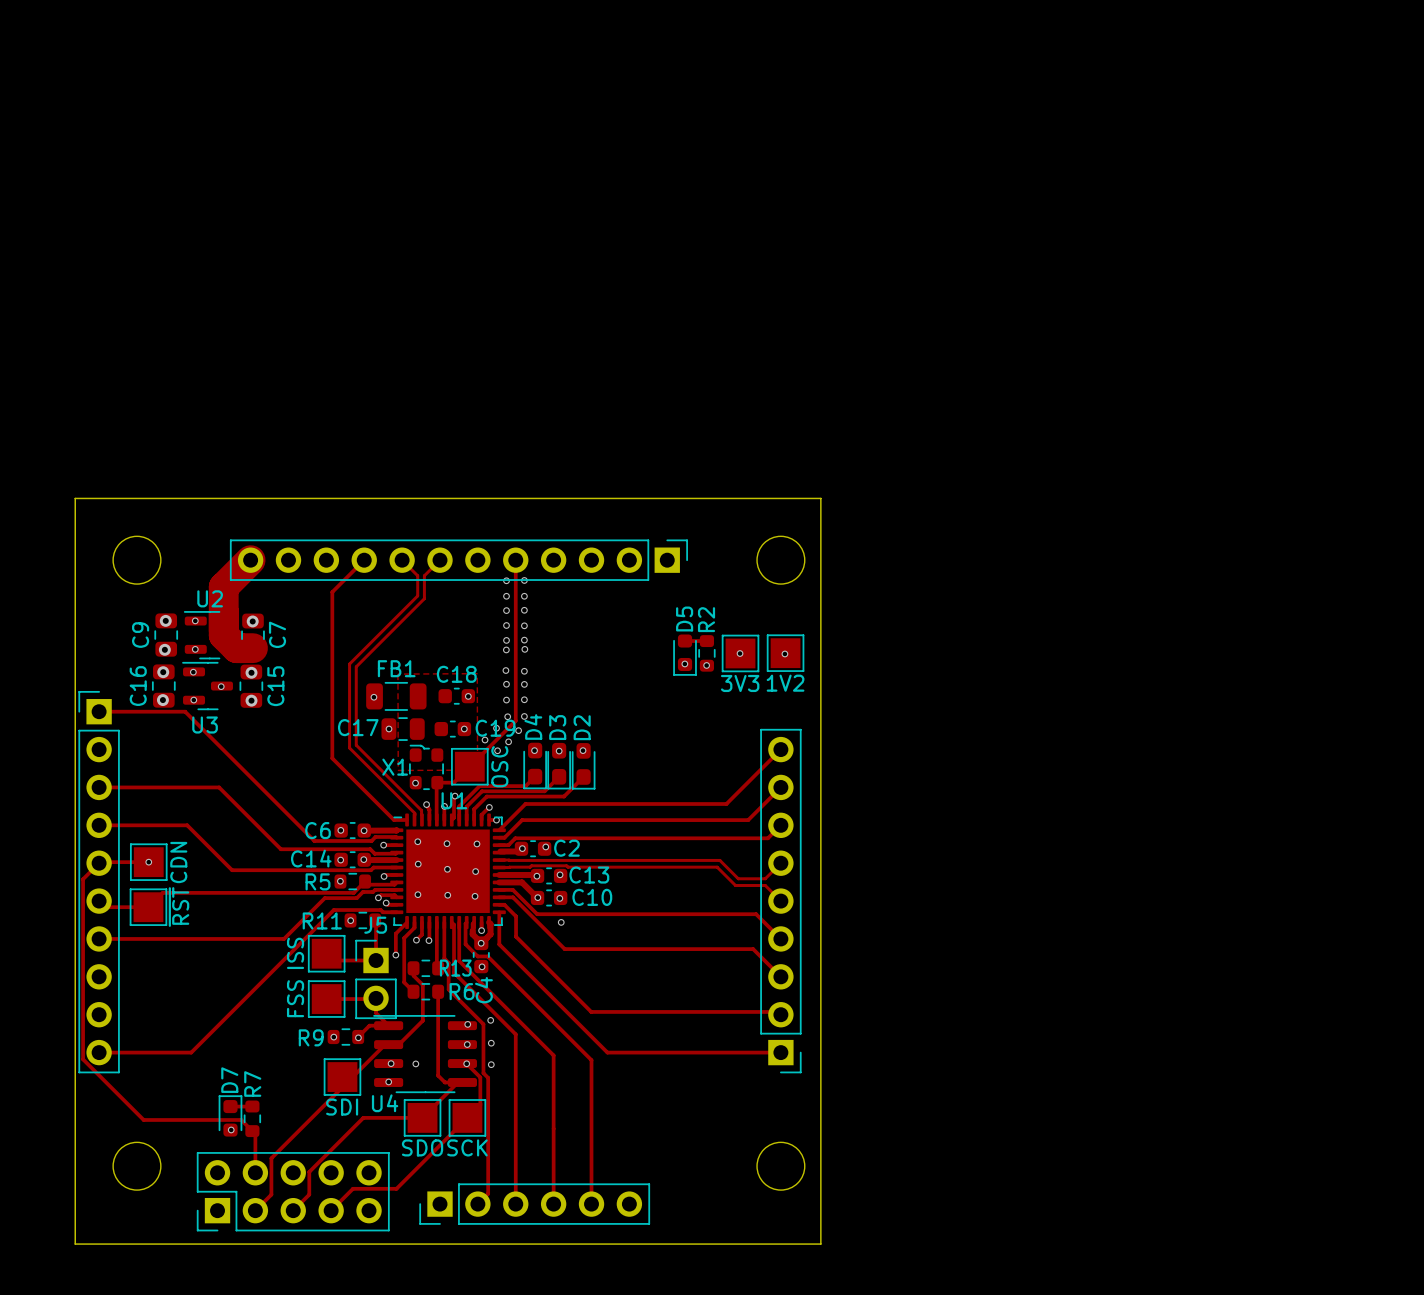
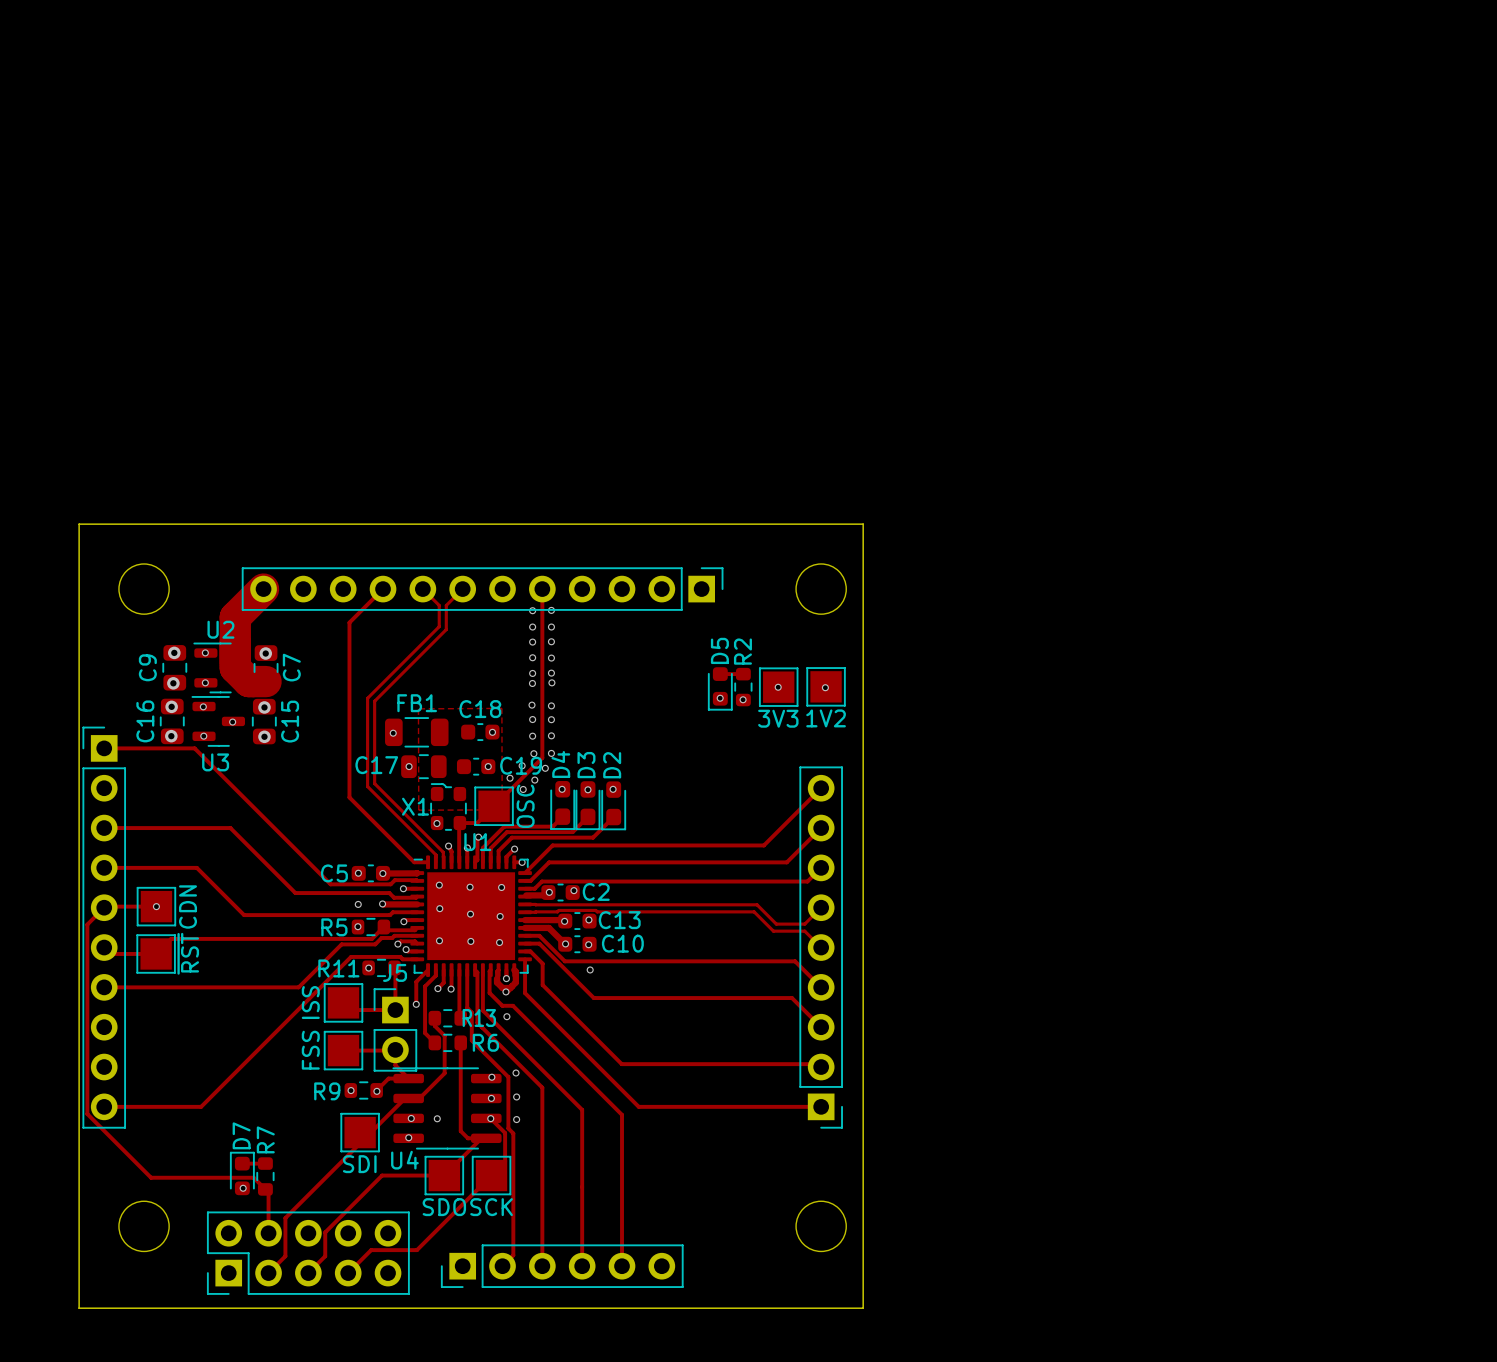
C6 name: C6 (318, 830) -> C5 (334, 873)
C14: (352, 859) -> none
C4: (481, 954) -> none

